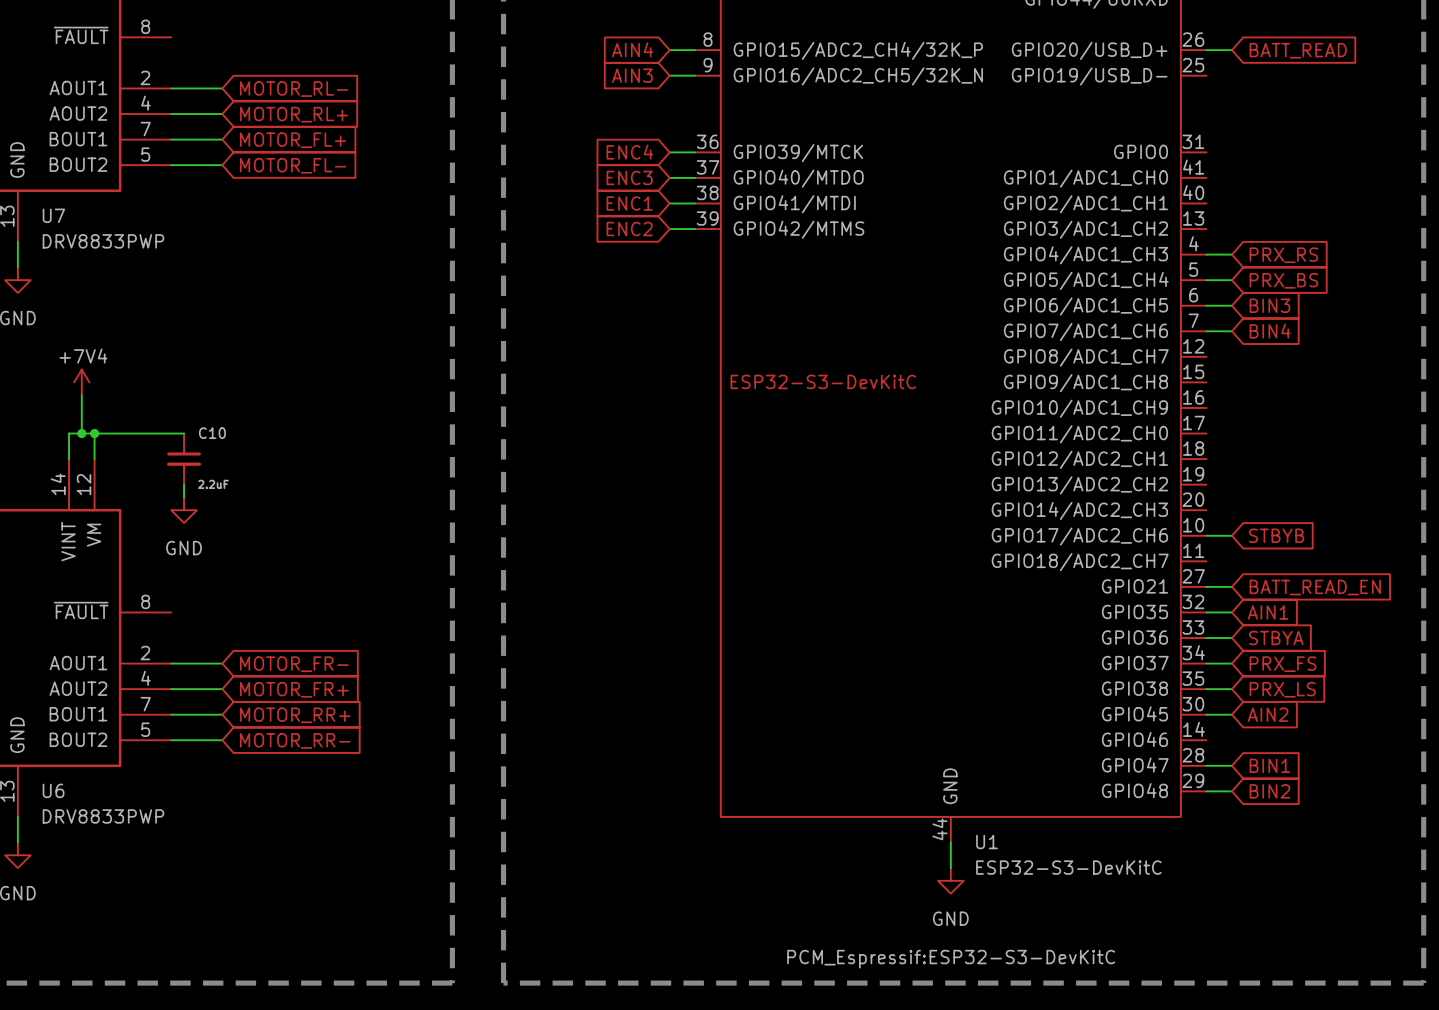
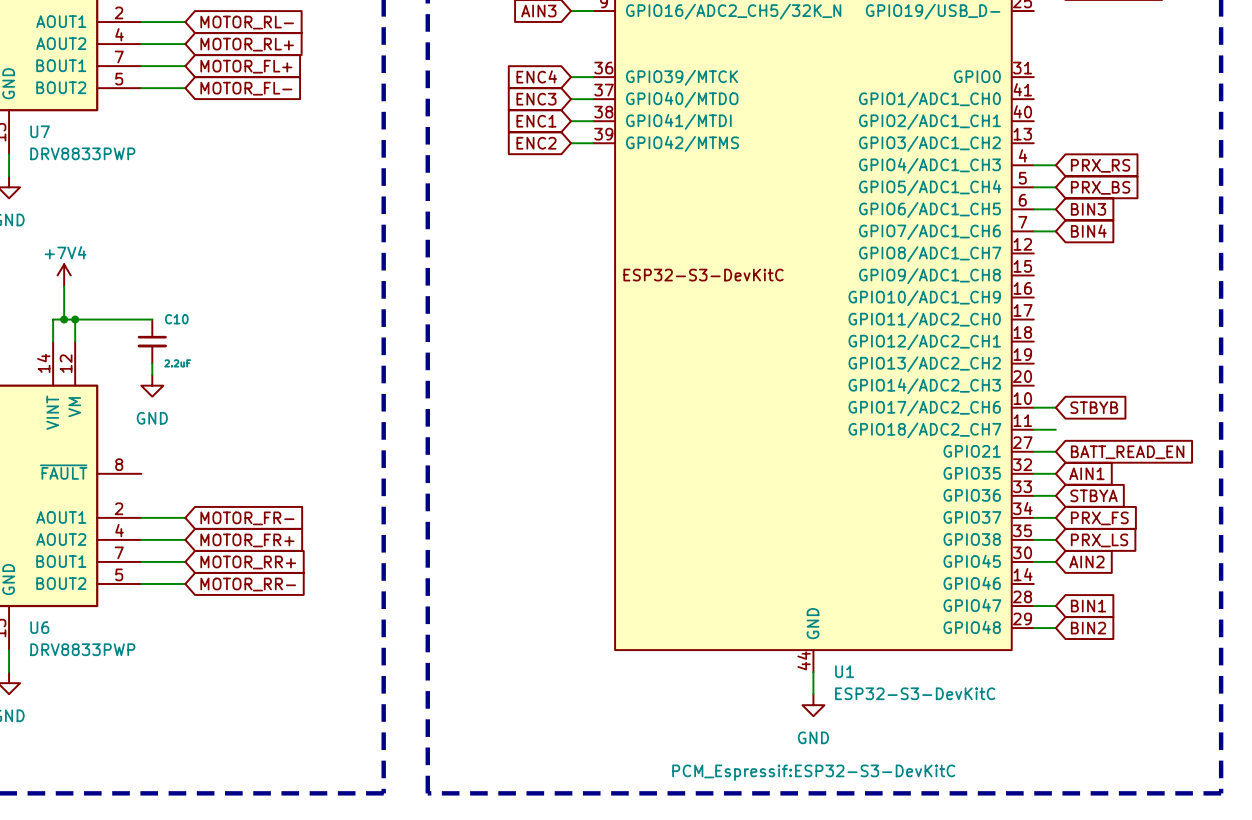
wire: none -> (1033, 429) (1055, 429)

